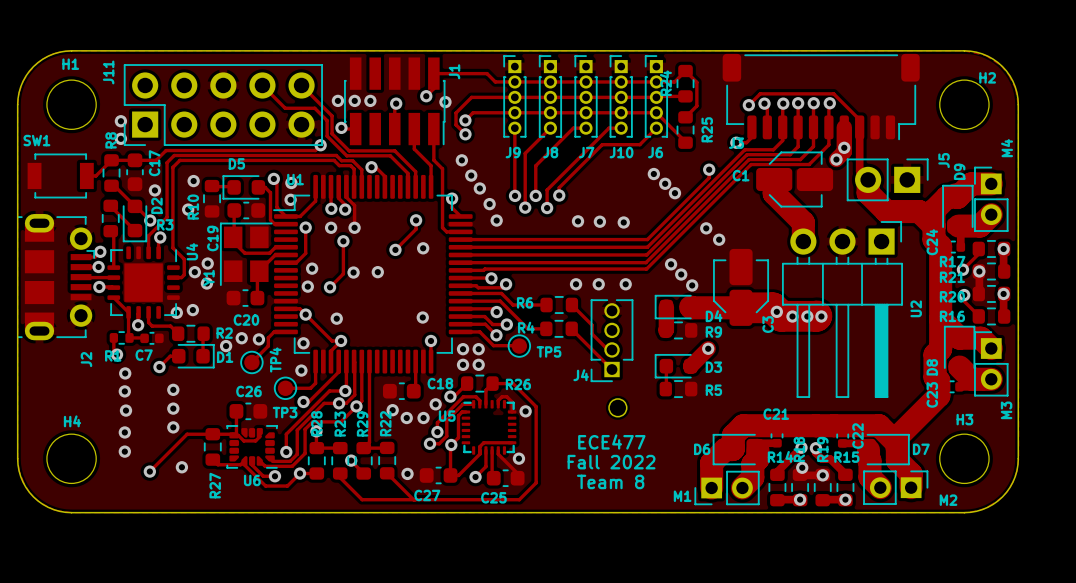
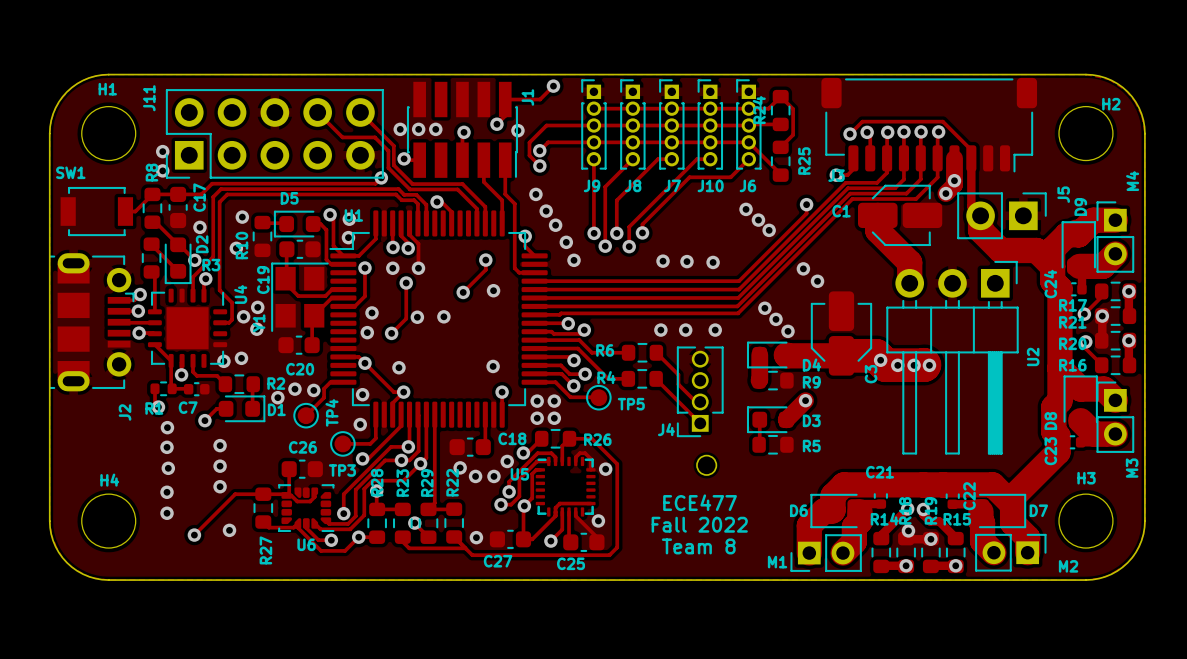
via: none -> (553, 86)
track: (465, 73) (487, 73) (495, 81) (514, 81) -> (540, 99) (553, 86)
track: (346, 483) (362, 499) (519, 499) (529, 489) -> (472, 555) (609, 555)
track: none -> (409, 548) (465, 548)
track: (403, 489) (413, 499) -> none

